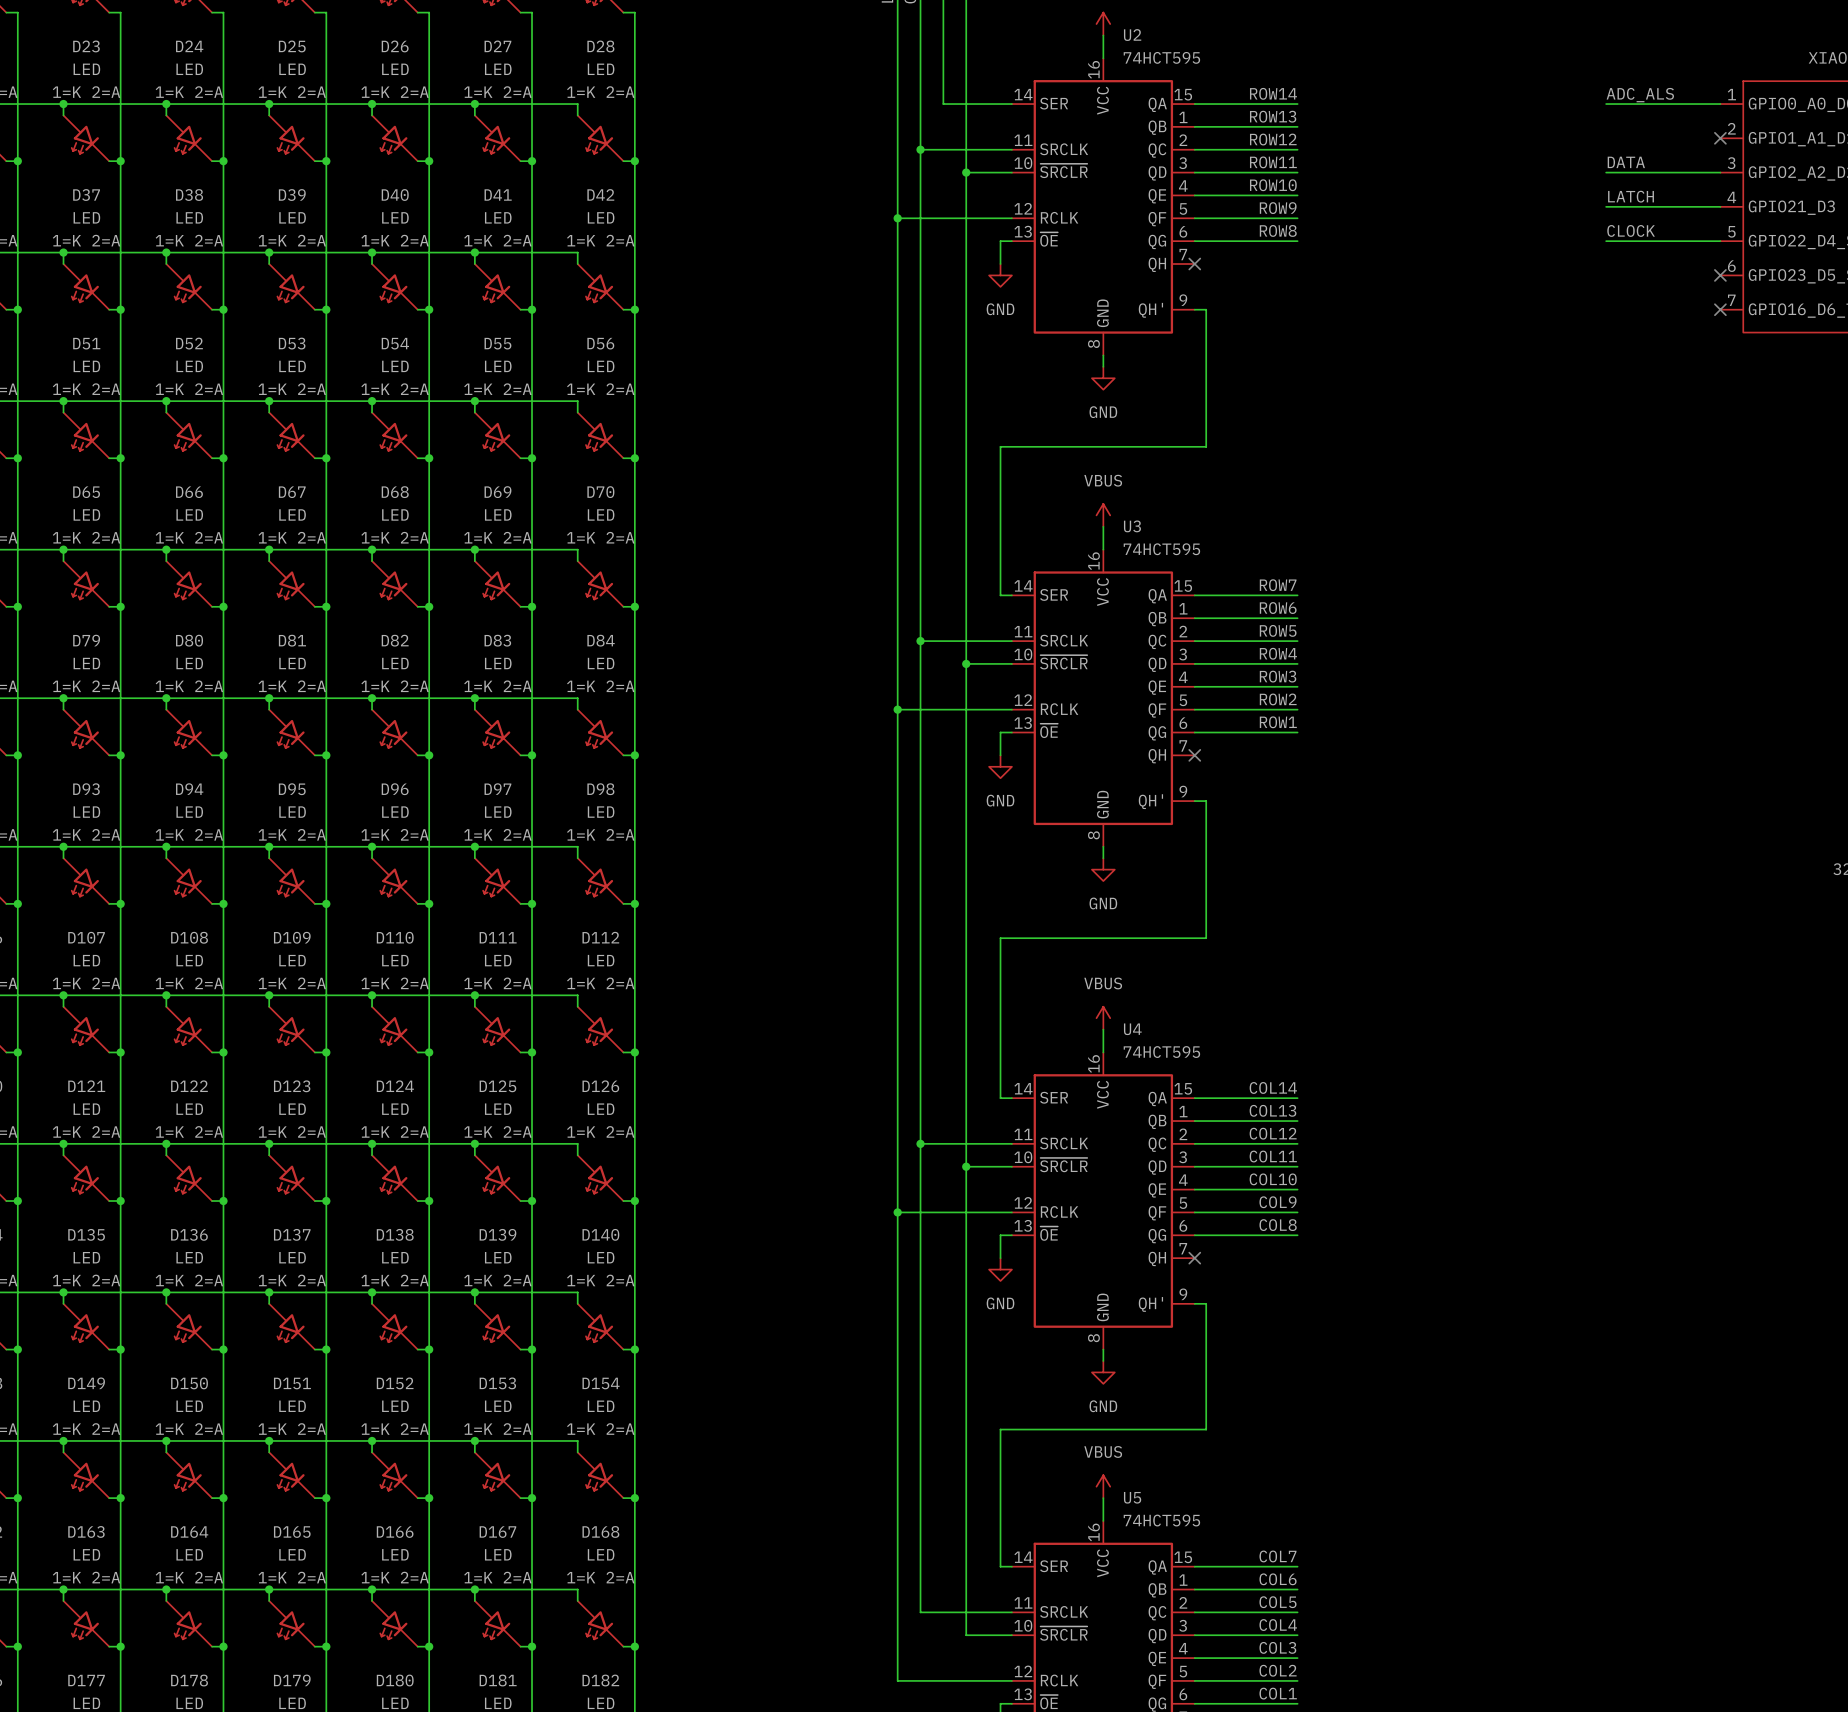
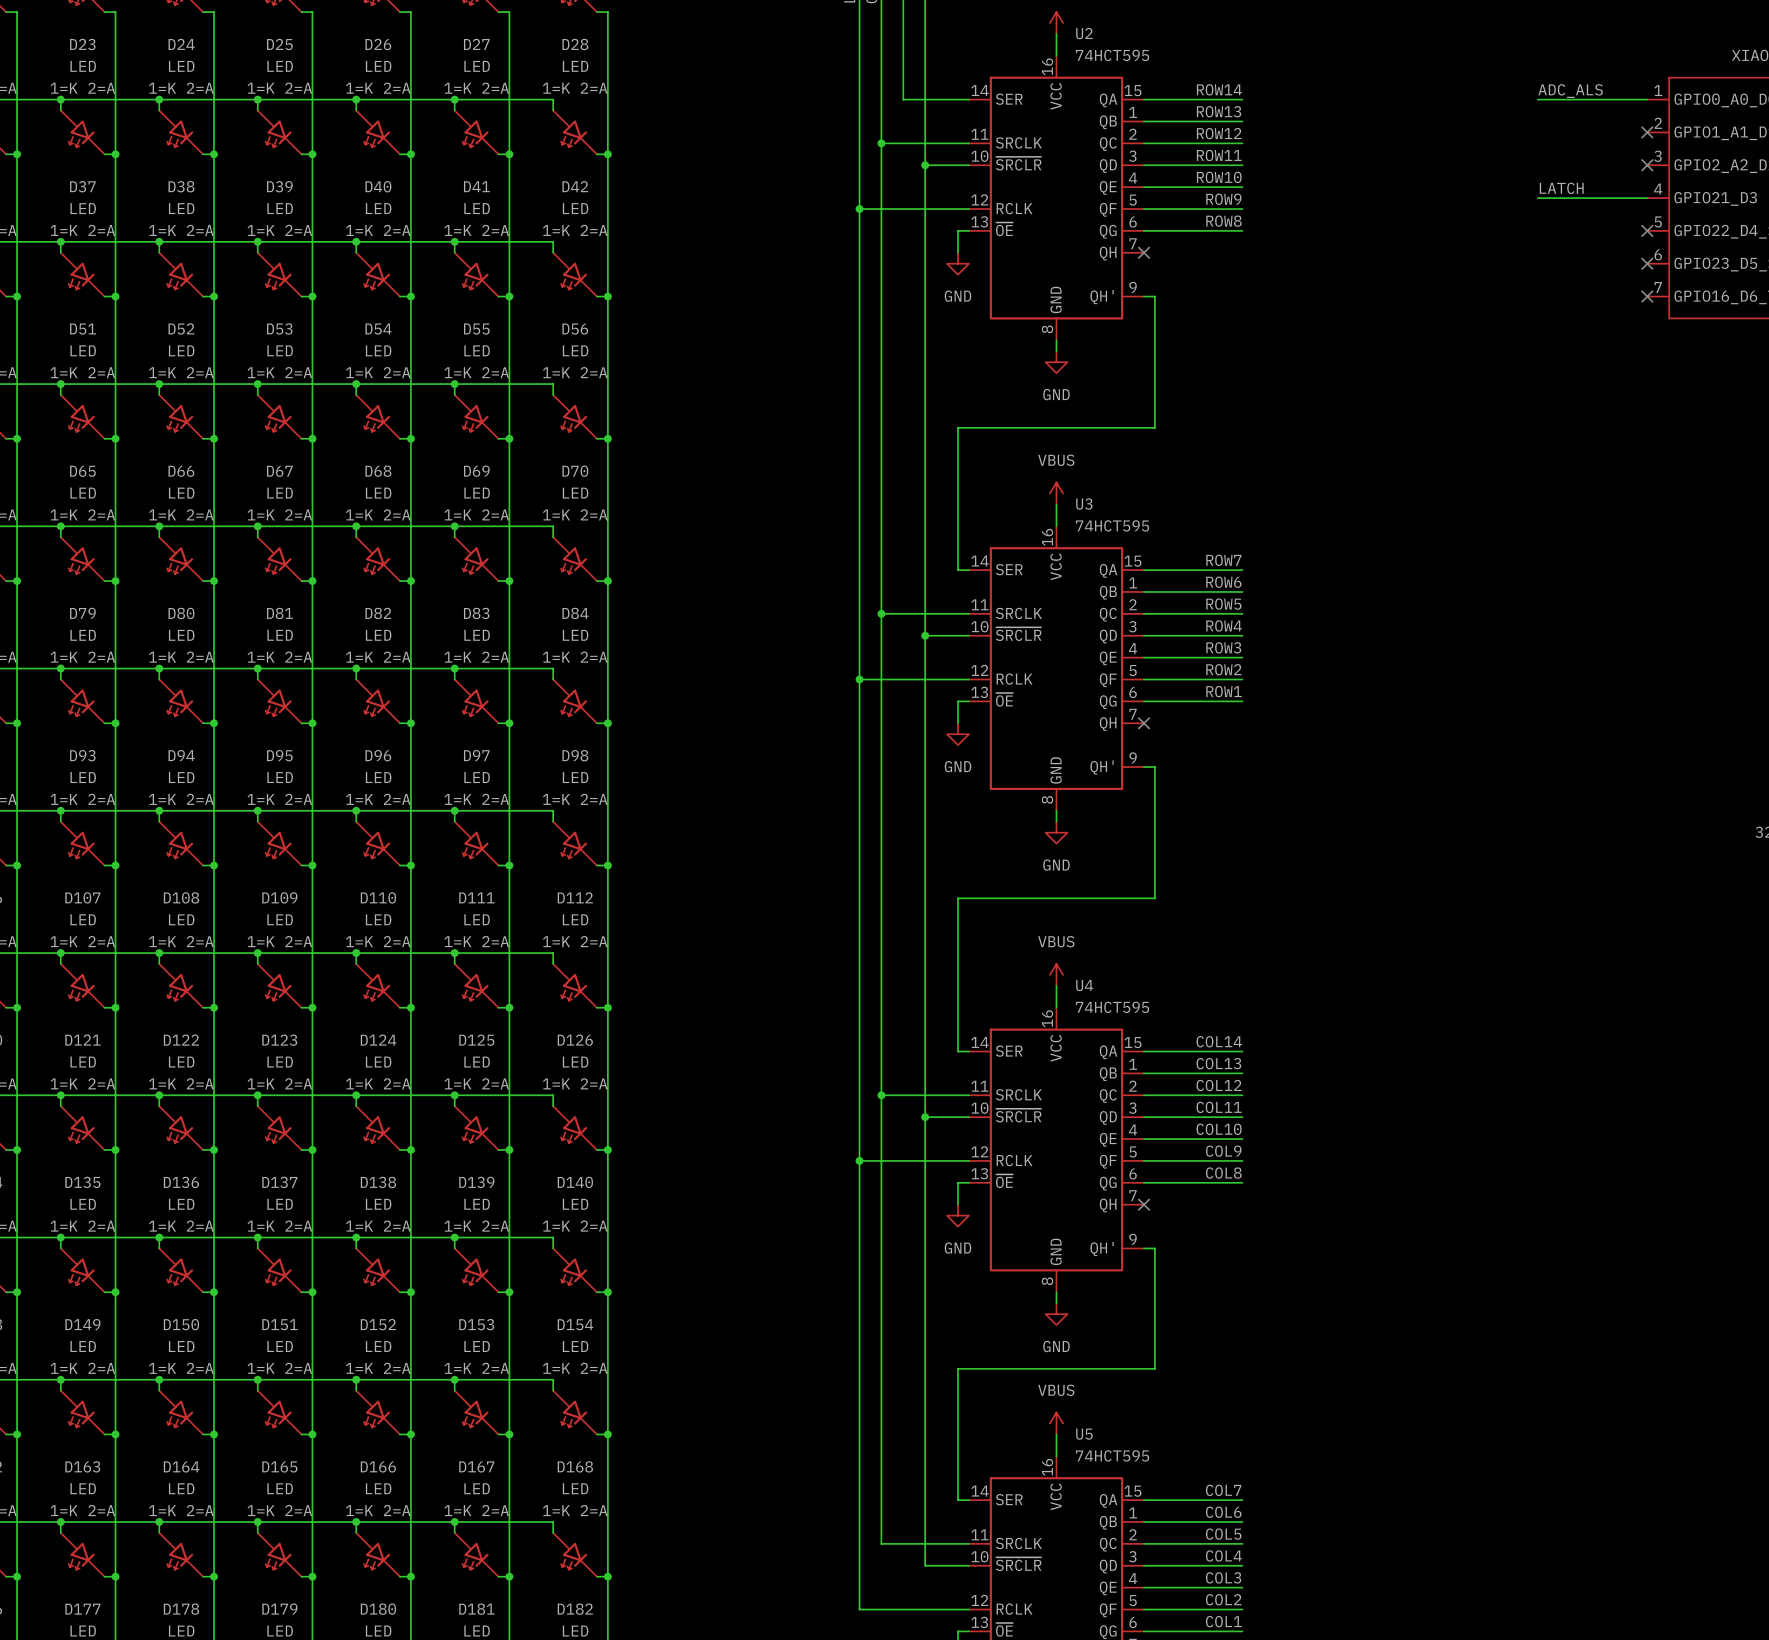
label: DATA (1626, 162) -> none
wire: (1606, 172) (1720, 172) -> none
no-connect mark: none -> (1647, 165)
label: CLOCK (1631, 230) -> none
wire: (1606, 241) (1720, 241) -> none
no-connect mark: none -> (1647, 230)

